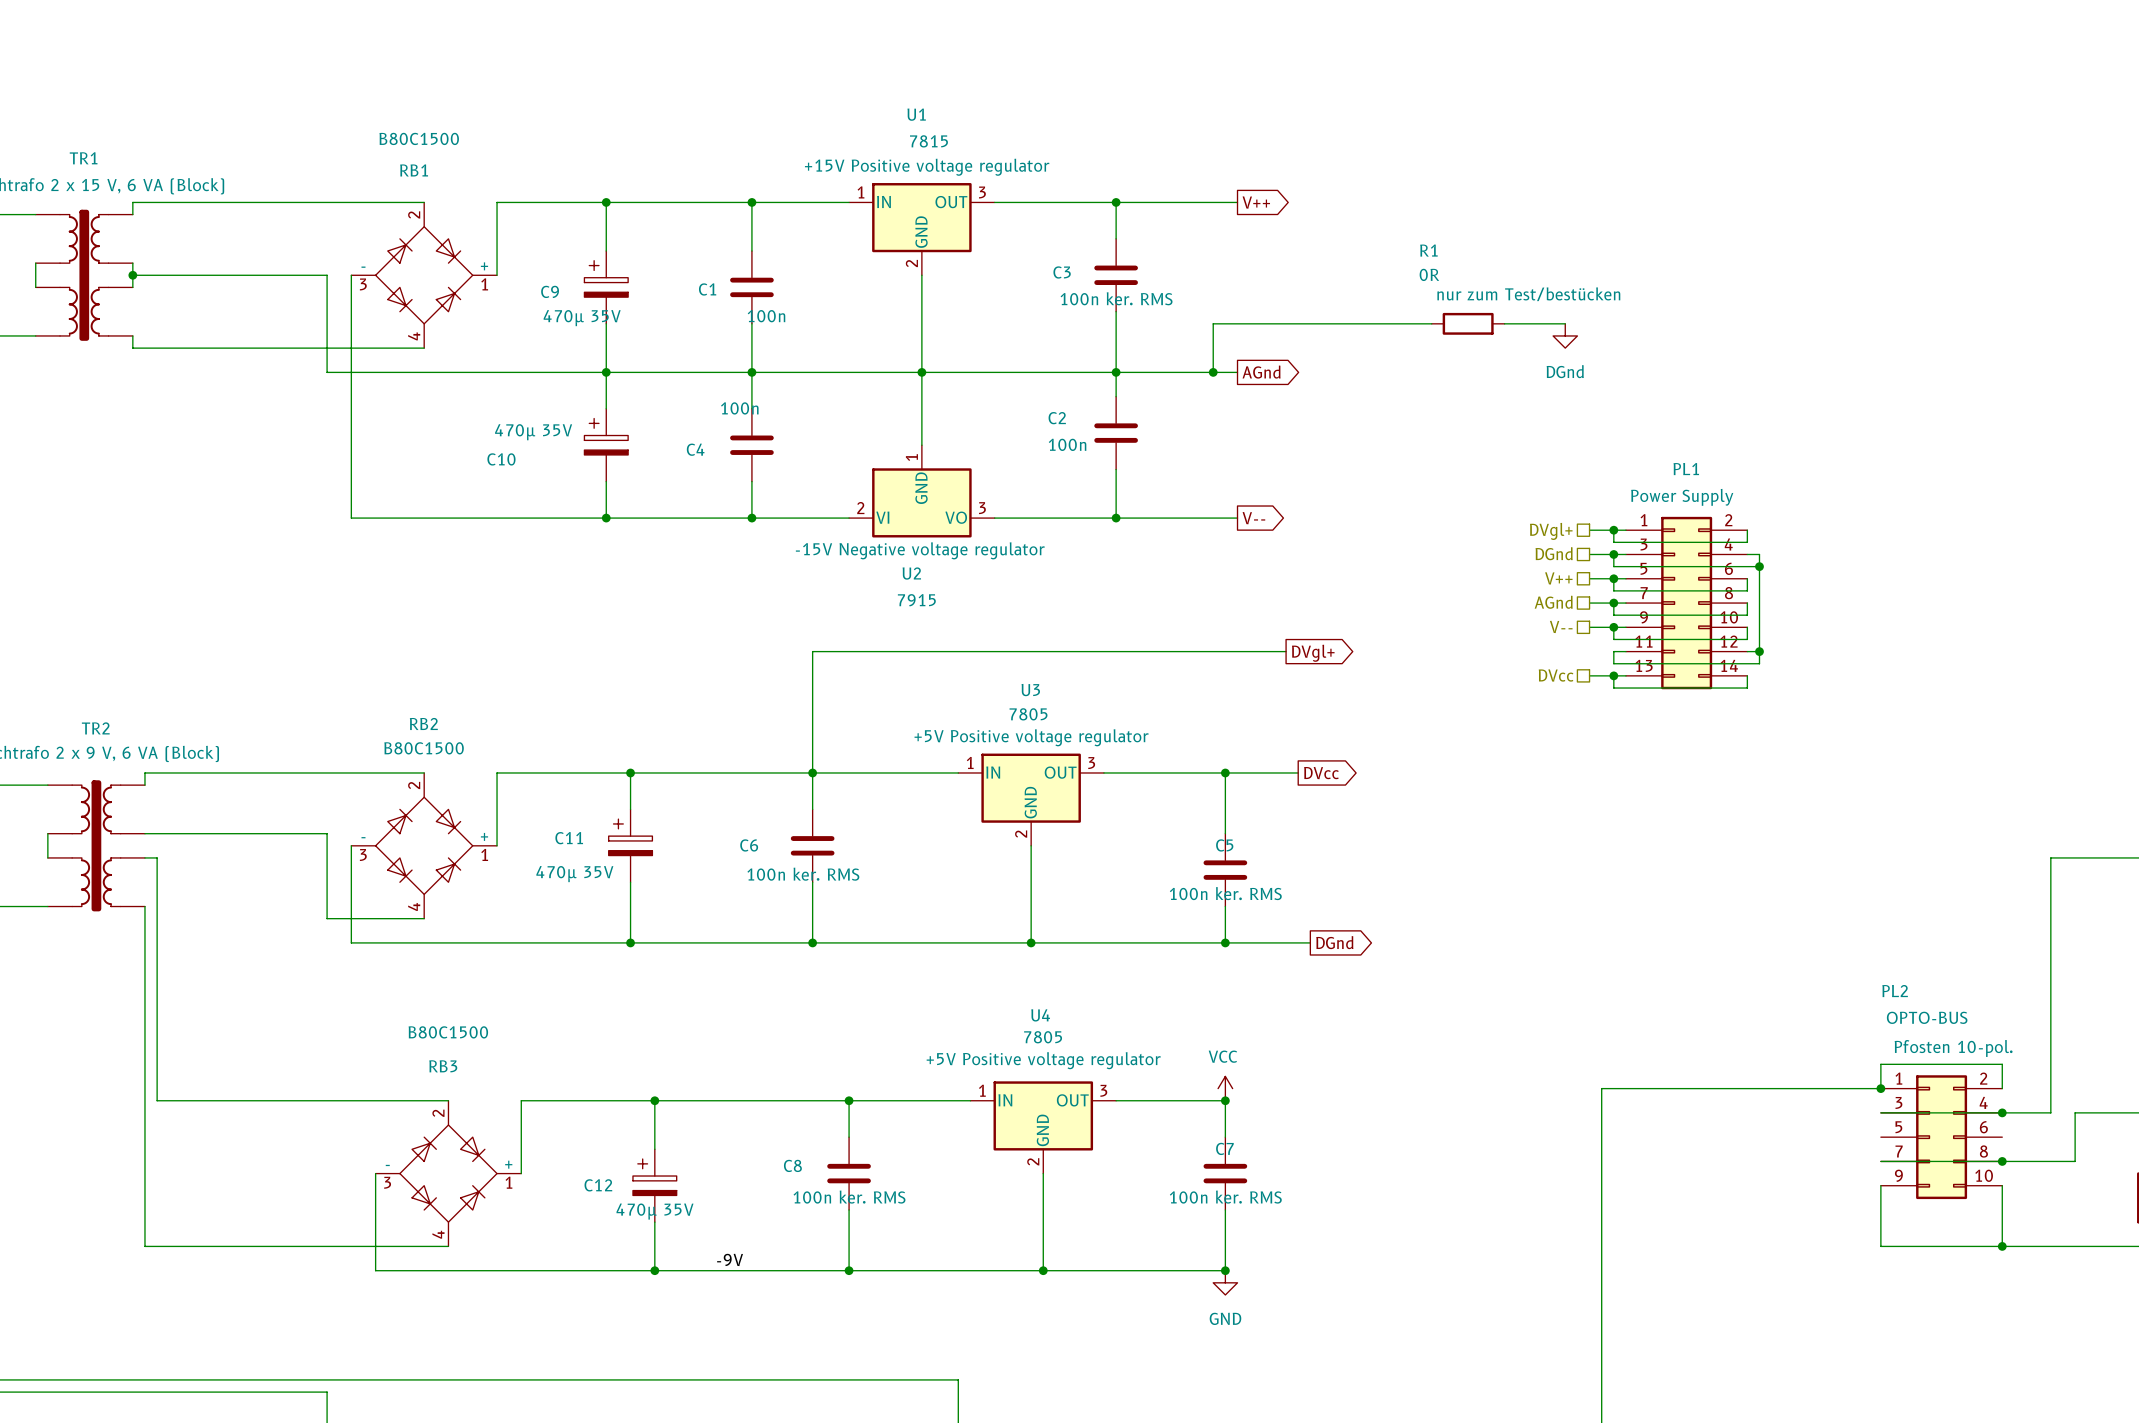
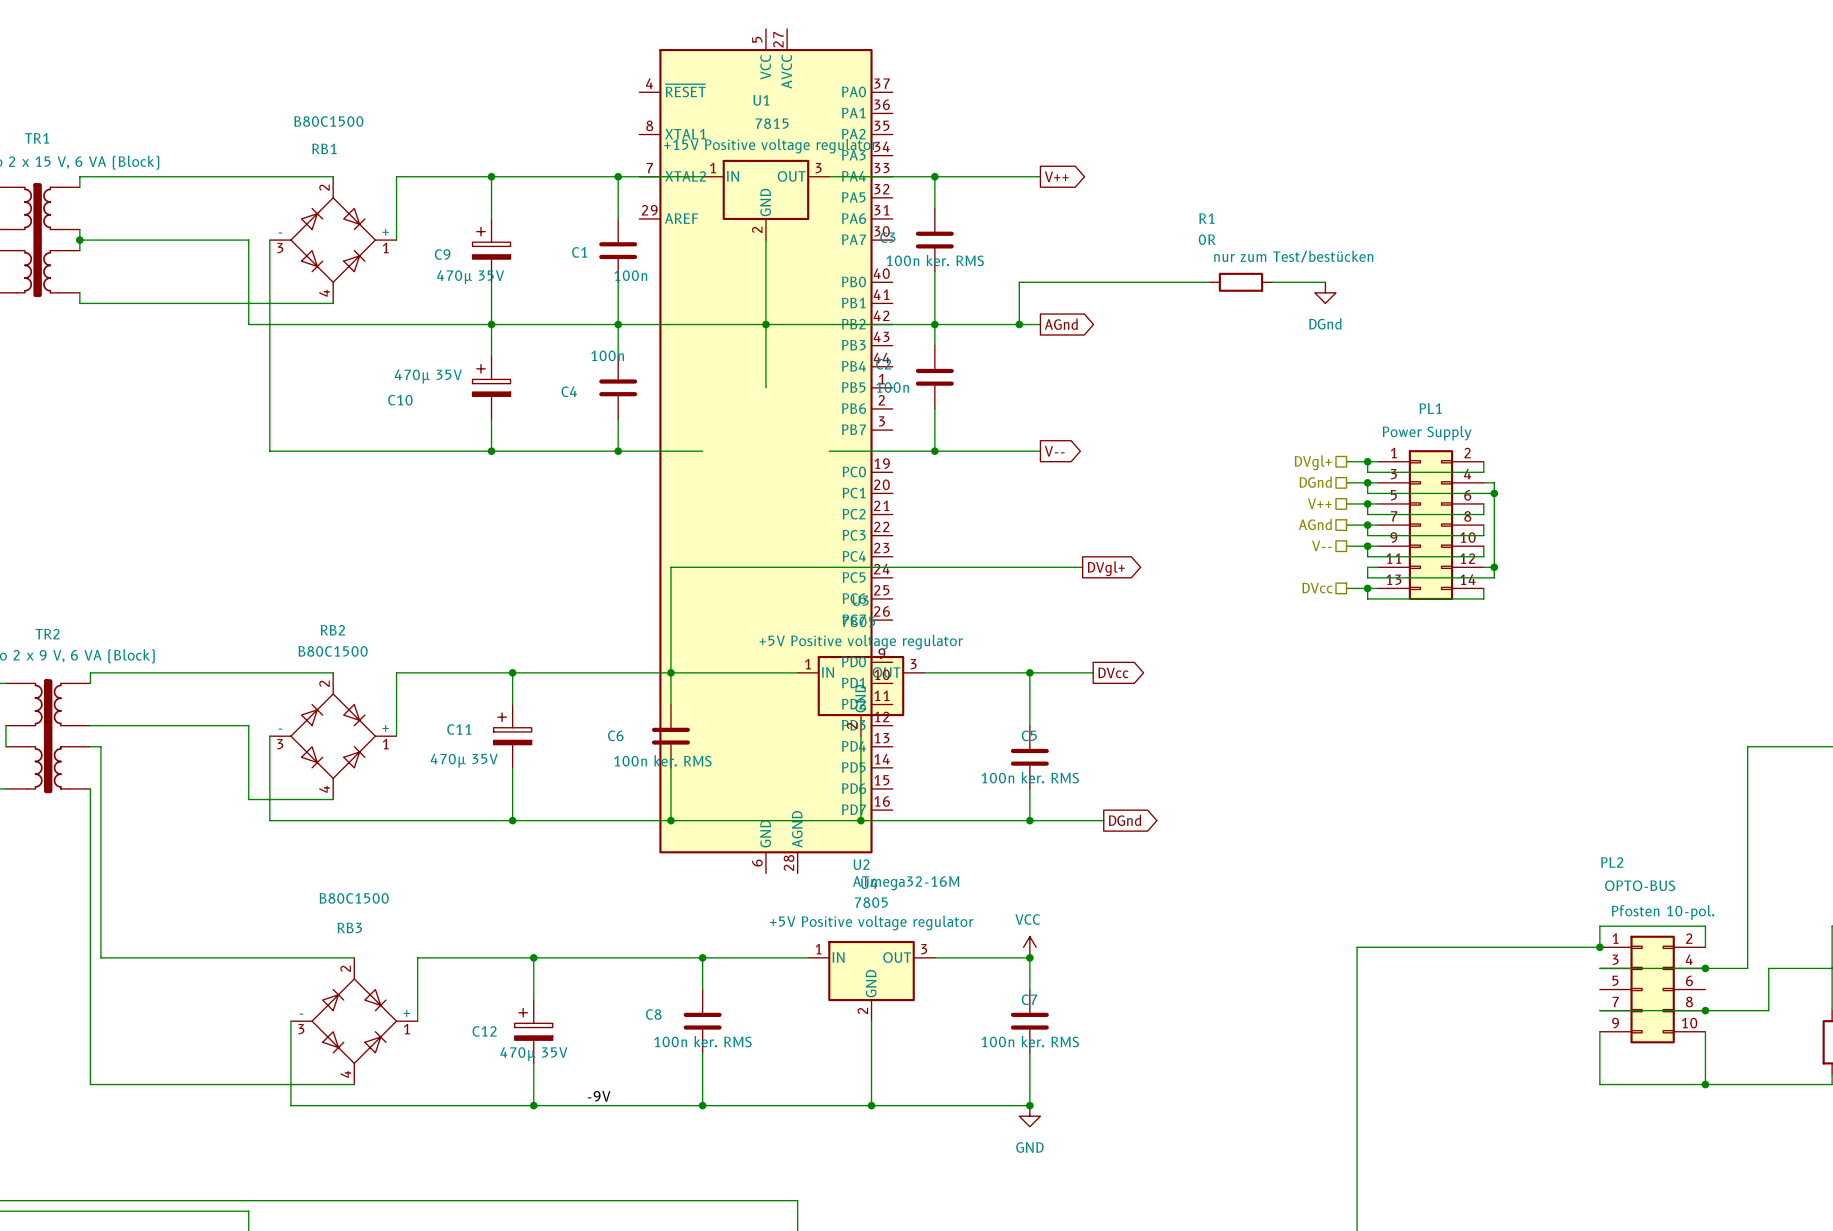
U2 symbol: [849, 445, 995, 538] -> [639, 28, 893, 874]
U2 text: -15V Negative voltage regulator (920, 550) -> none
U2 name position: U2 (911, 573) -> U2 (861, 864)
U2 value: 7915 (916, 600) -> ATmega32-16M (906, 883)

